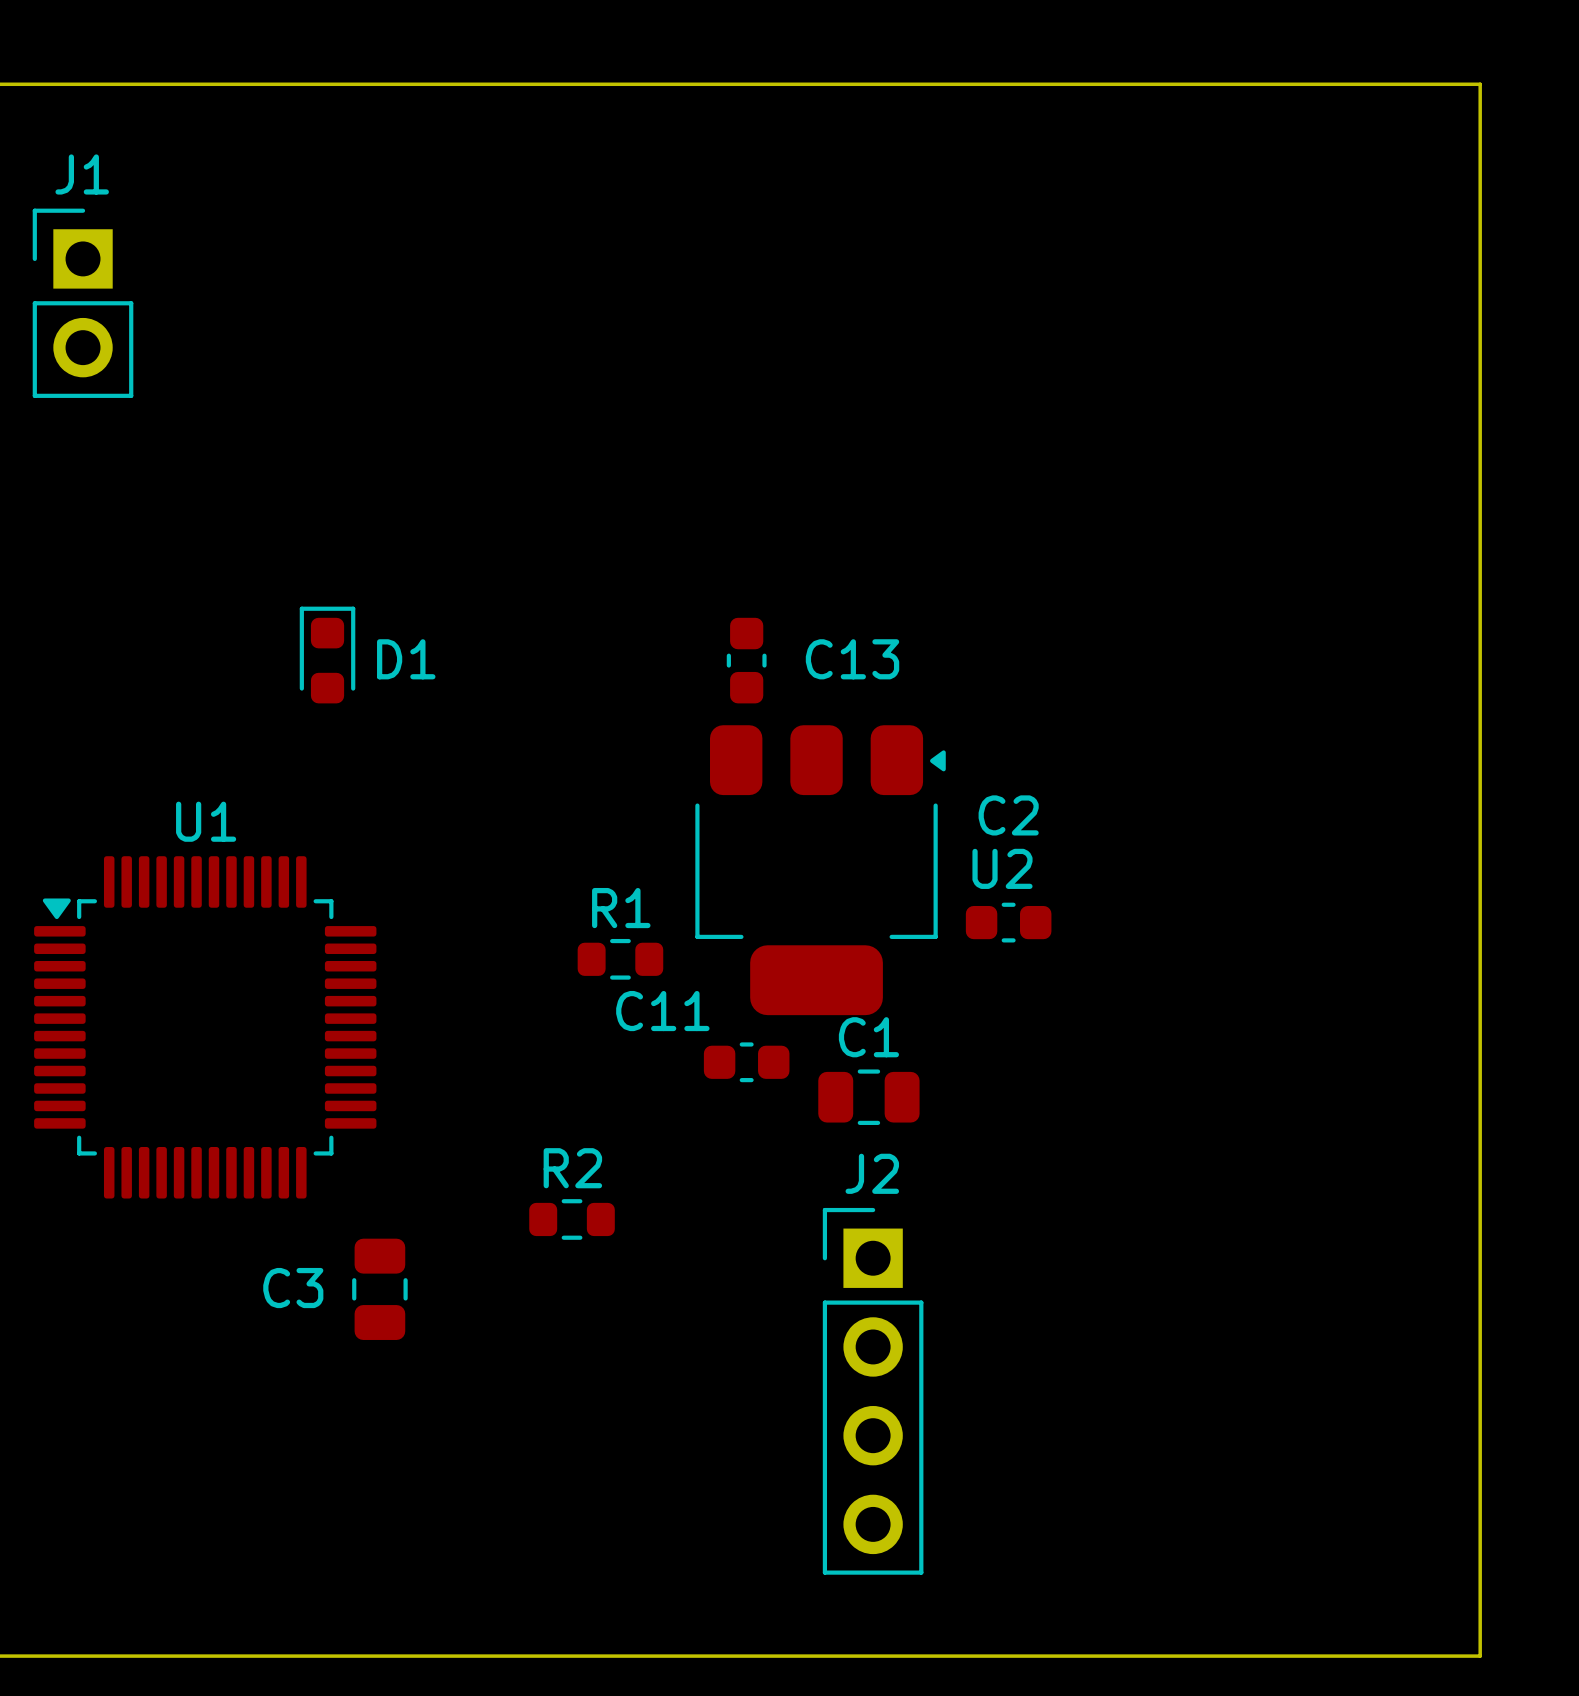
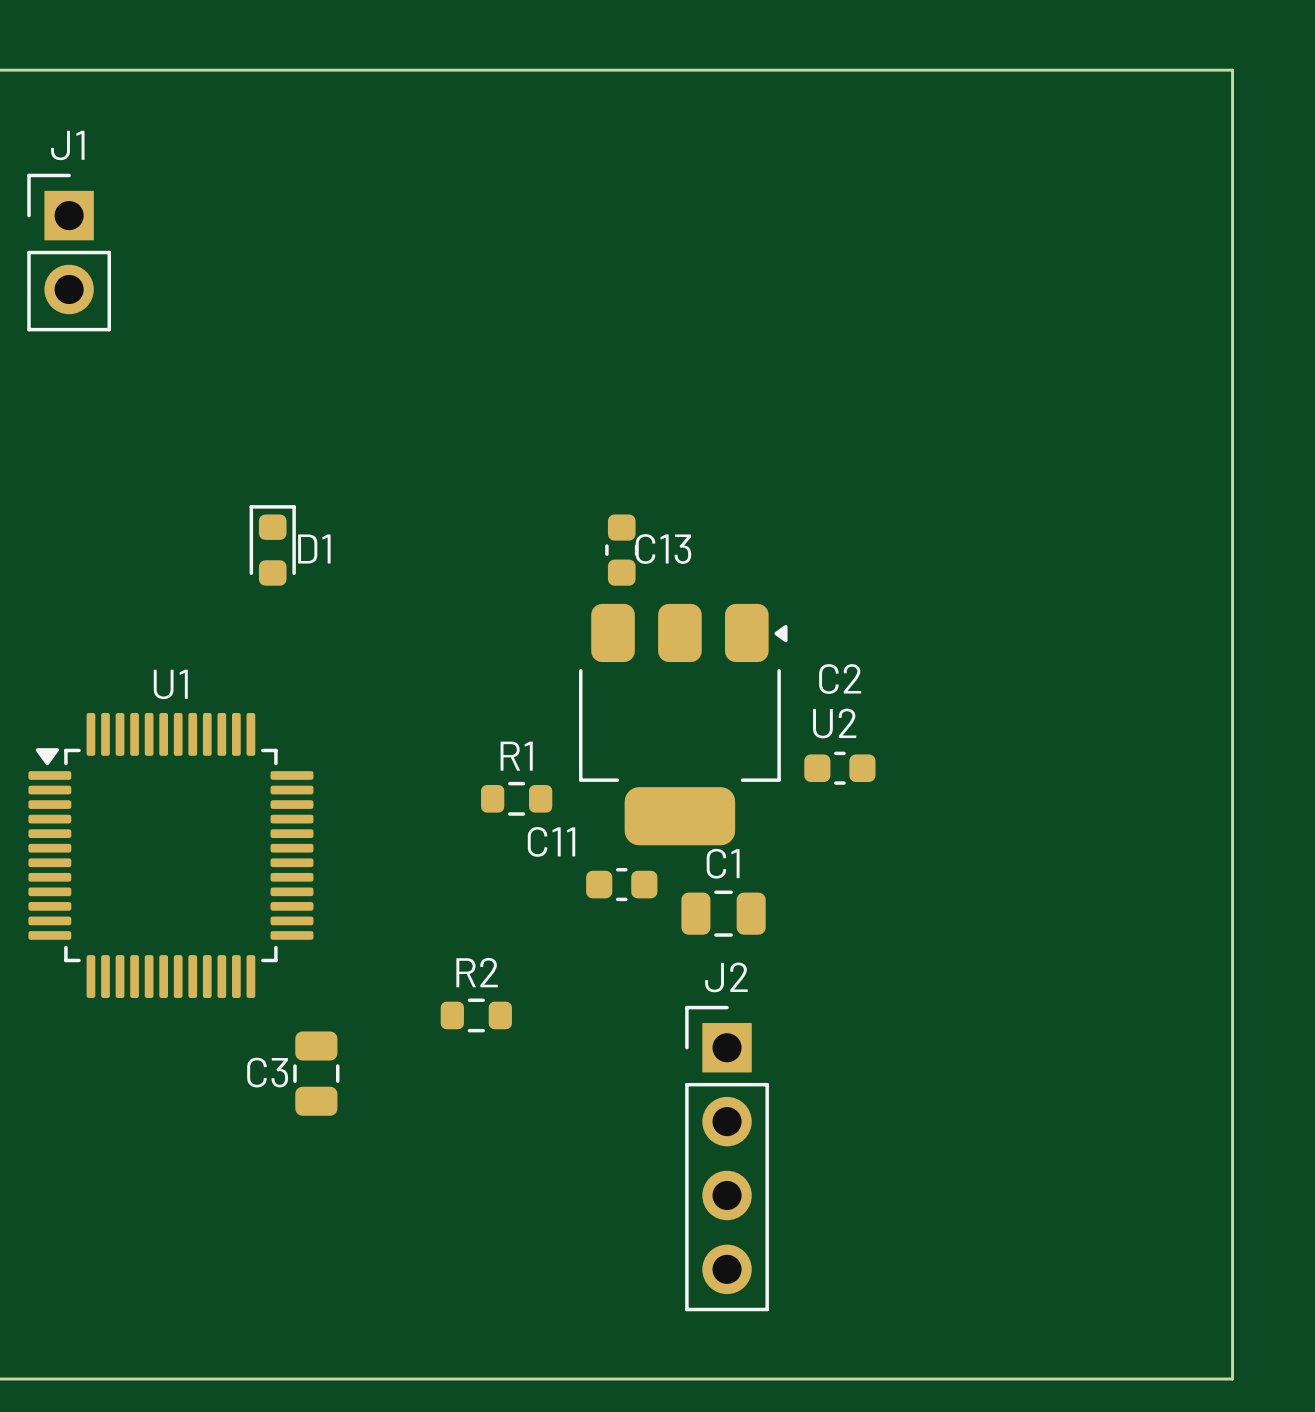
D1 name position: D1 (406, 659) -> D1 (314, 549)
C13 name position: C13 (852, 659) -> C13 (663, 549)
C3 name position: C3 (293, 1288) -> C3 (267, 1072)

